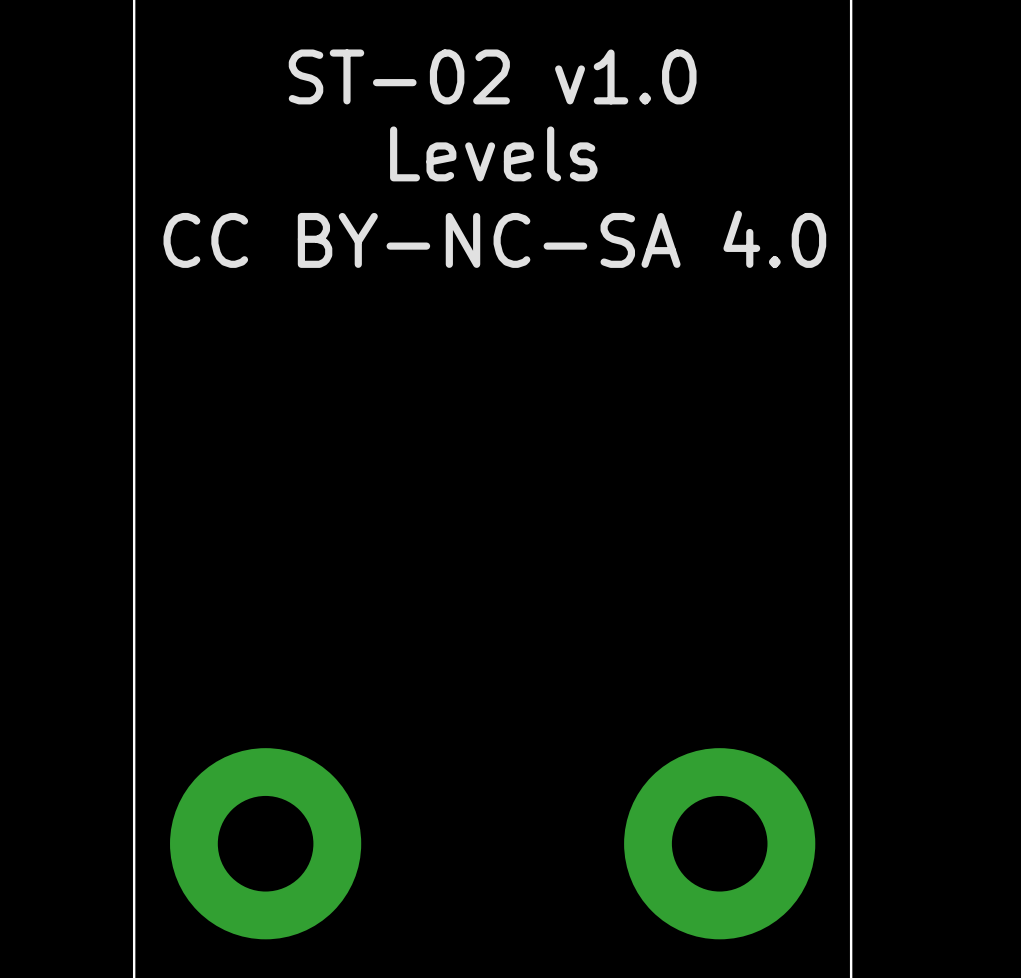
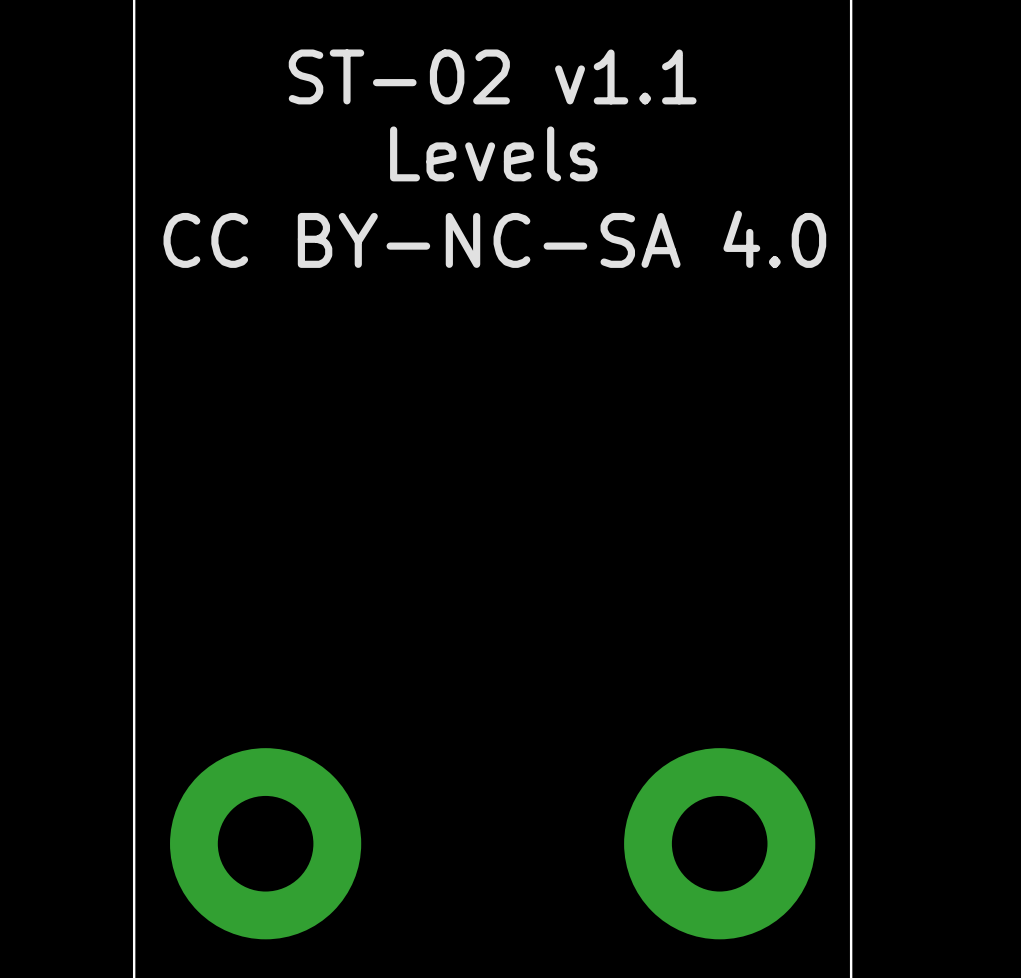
text: ST-02 v1.0 (492, 76) -> ST-02 v1.1 (492, 76)

